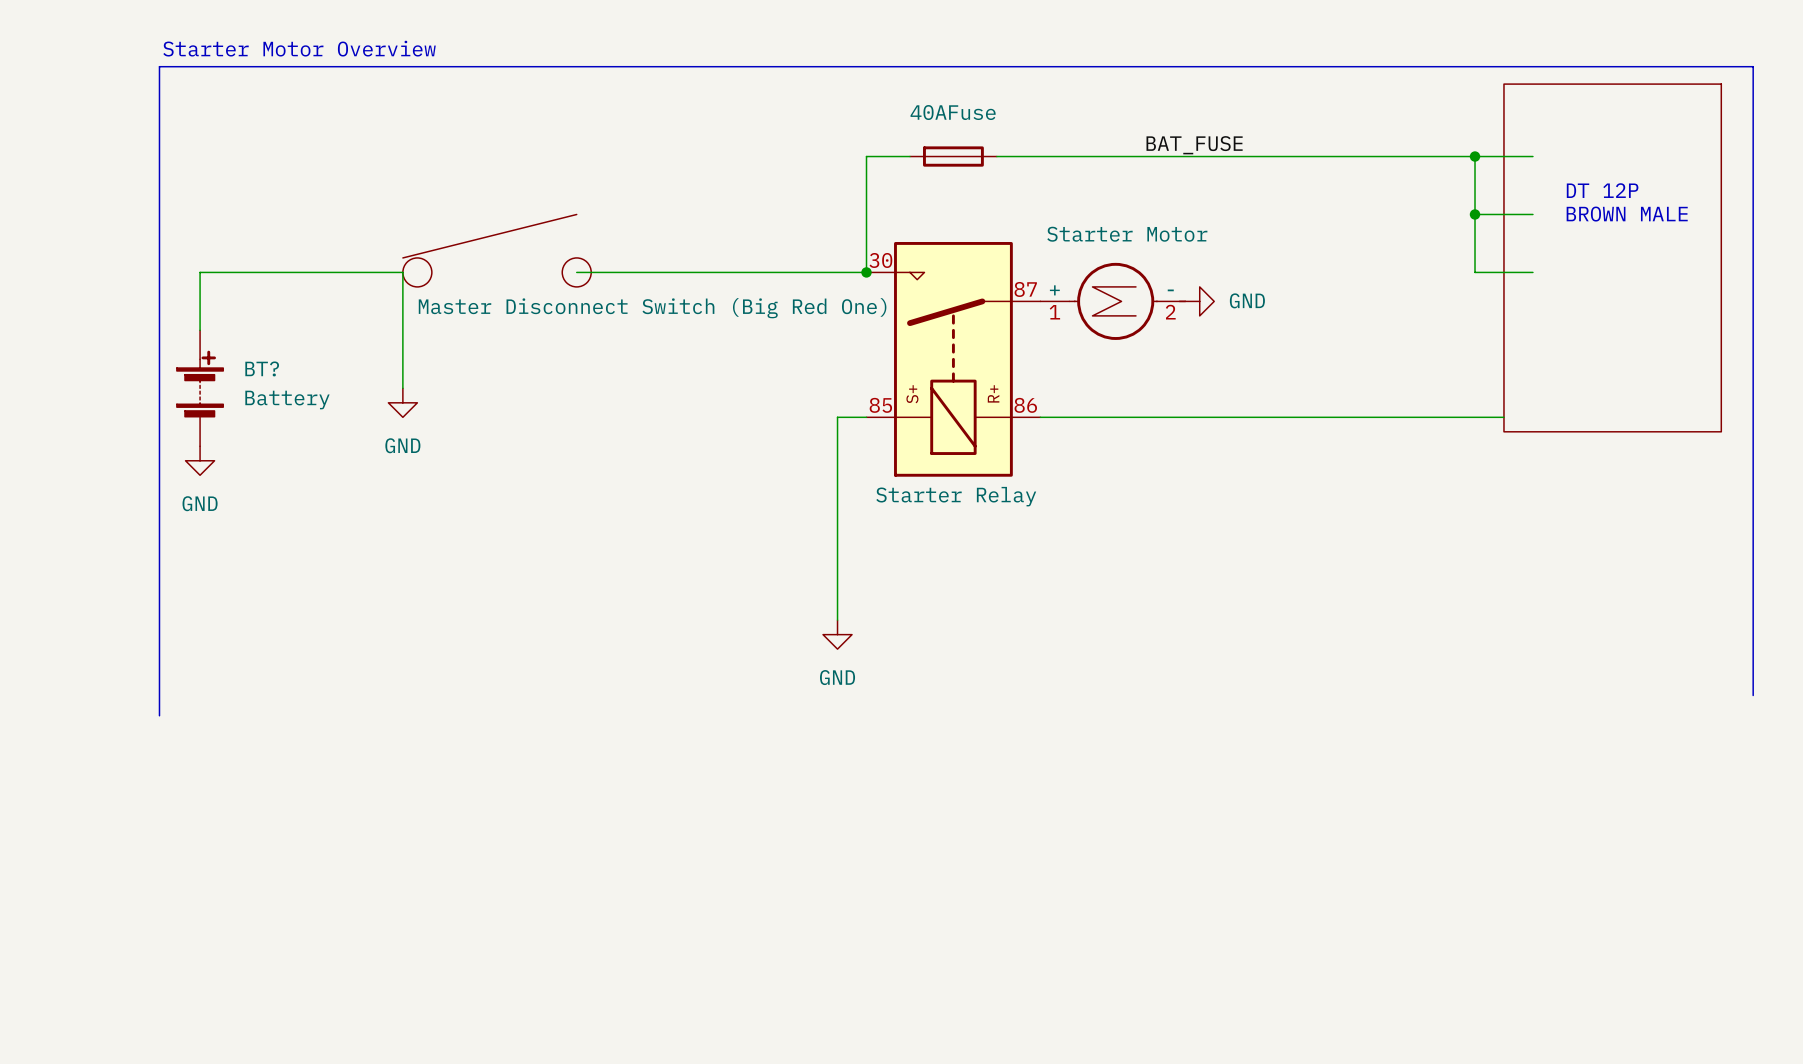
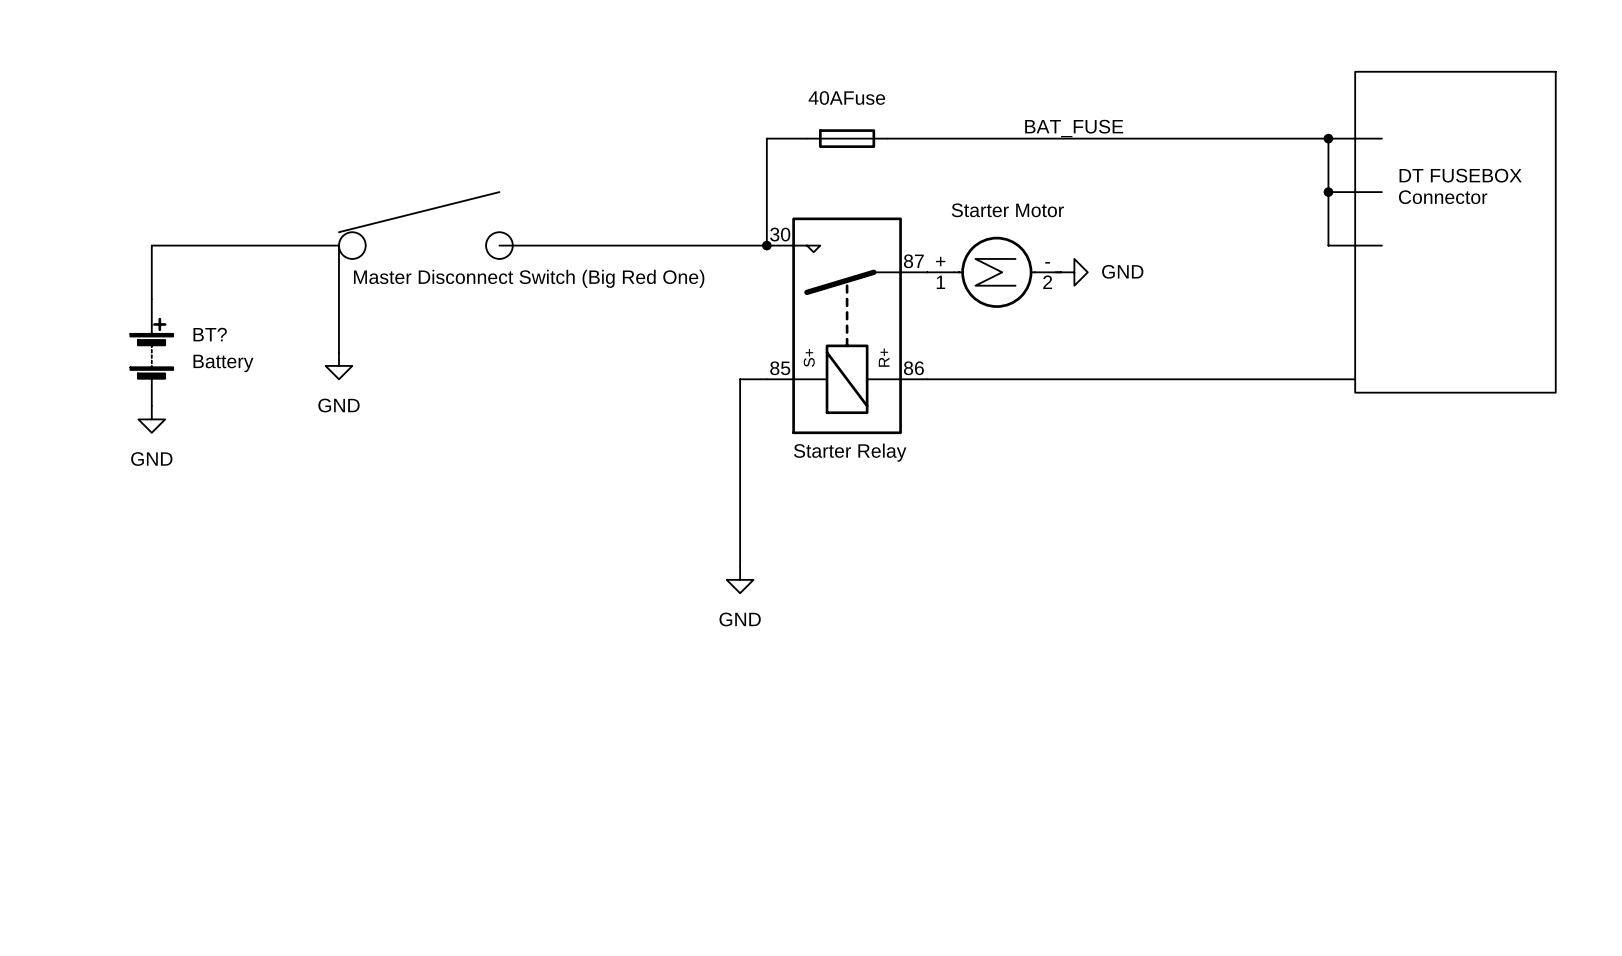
text: Starter Motor Overview (299, 48) -> none
text: DT 12P (1602, 190) -> none
text: none -> DT FUSEBOX (1460, 175)
text: BROWN MALE (1627, 214) -> none
text: none -> Connector (1443, 197)
line: (1753, 695) (1753, 66) (159, 66) (159, 715) -> none

